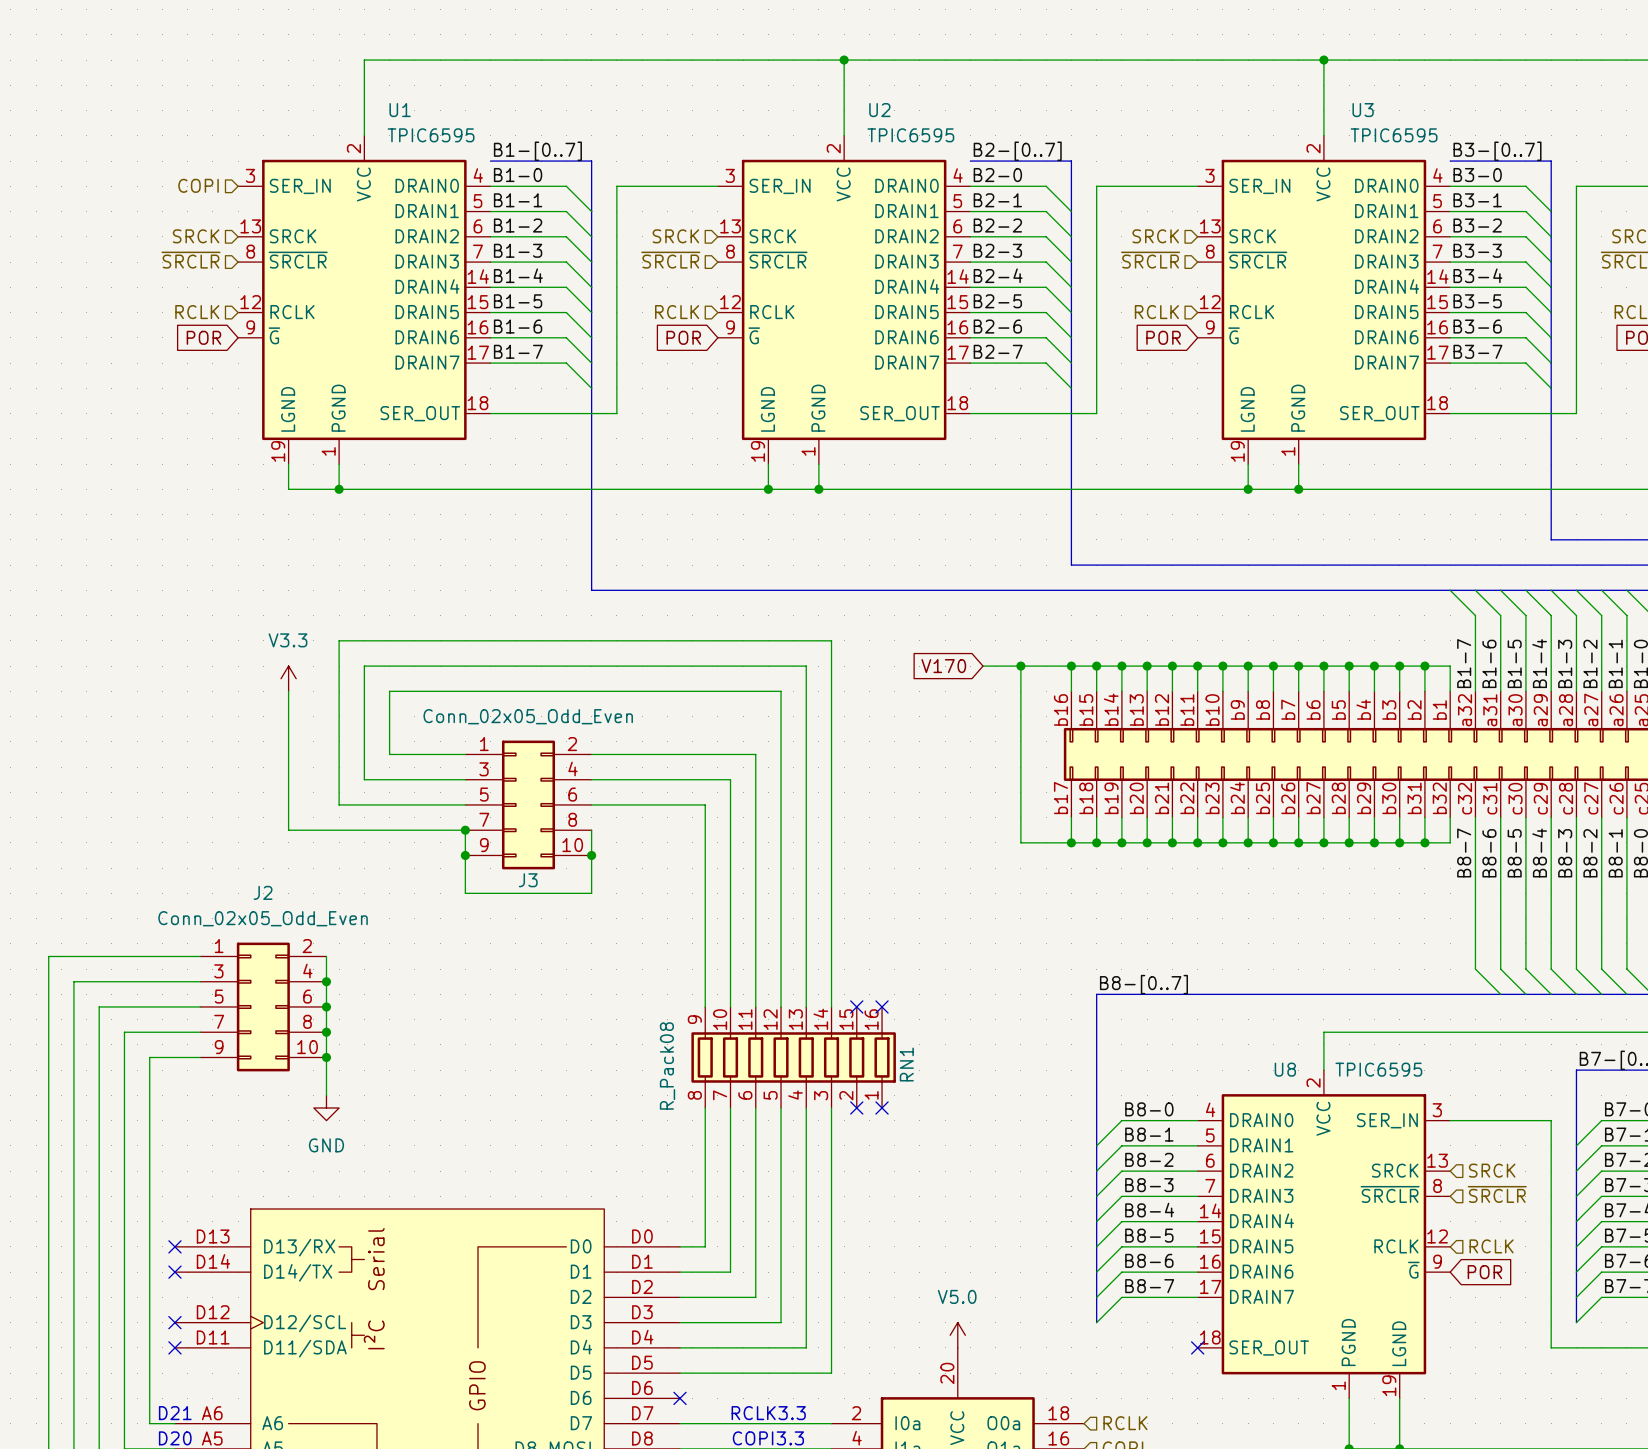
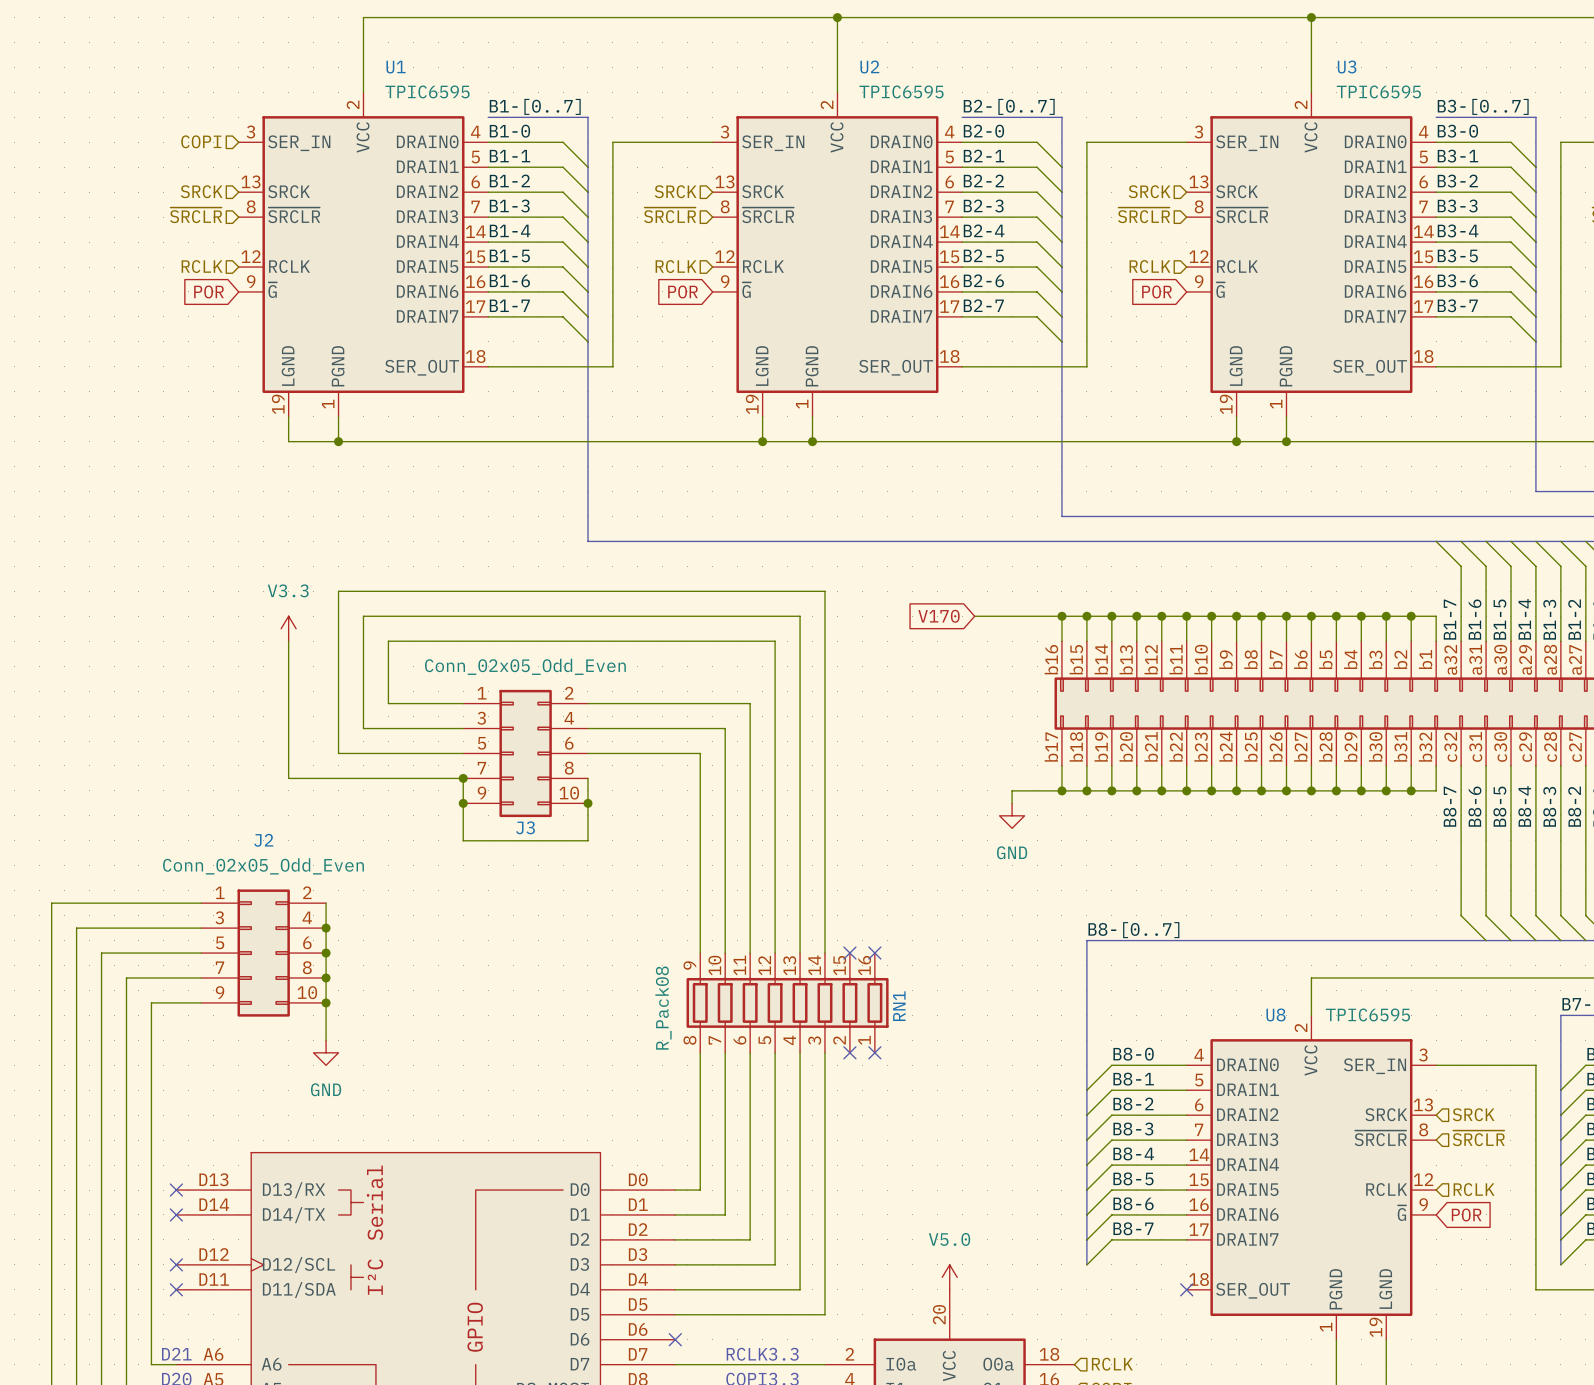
wire: (1020, 666) (1020, 842) -> (1012, 803) (1012, 790)
junction: (1020, 666) -> none
power symbol: none -> GND (1012, 815)

